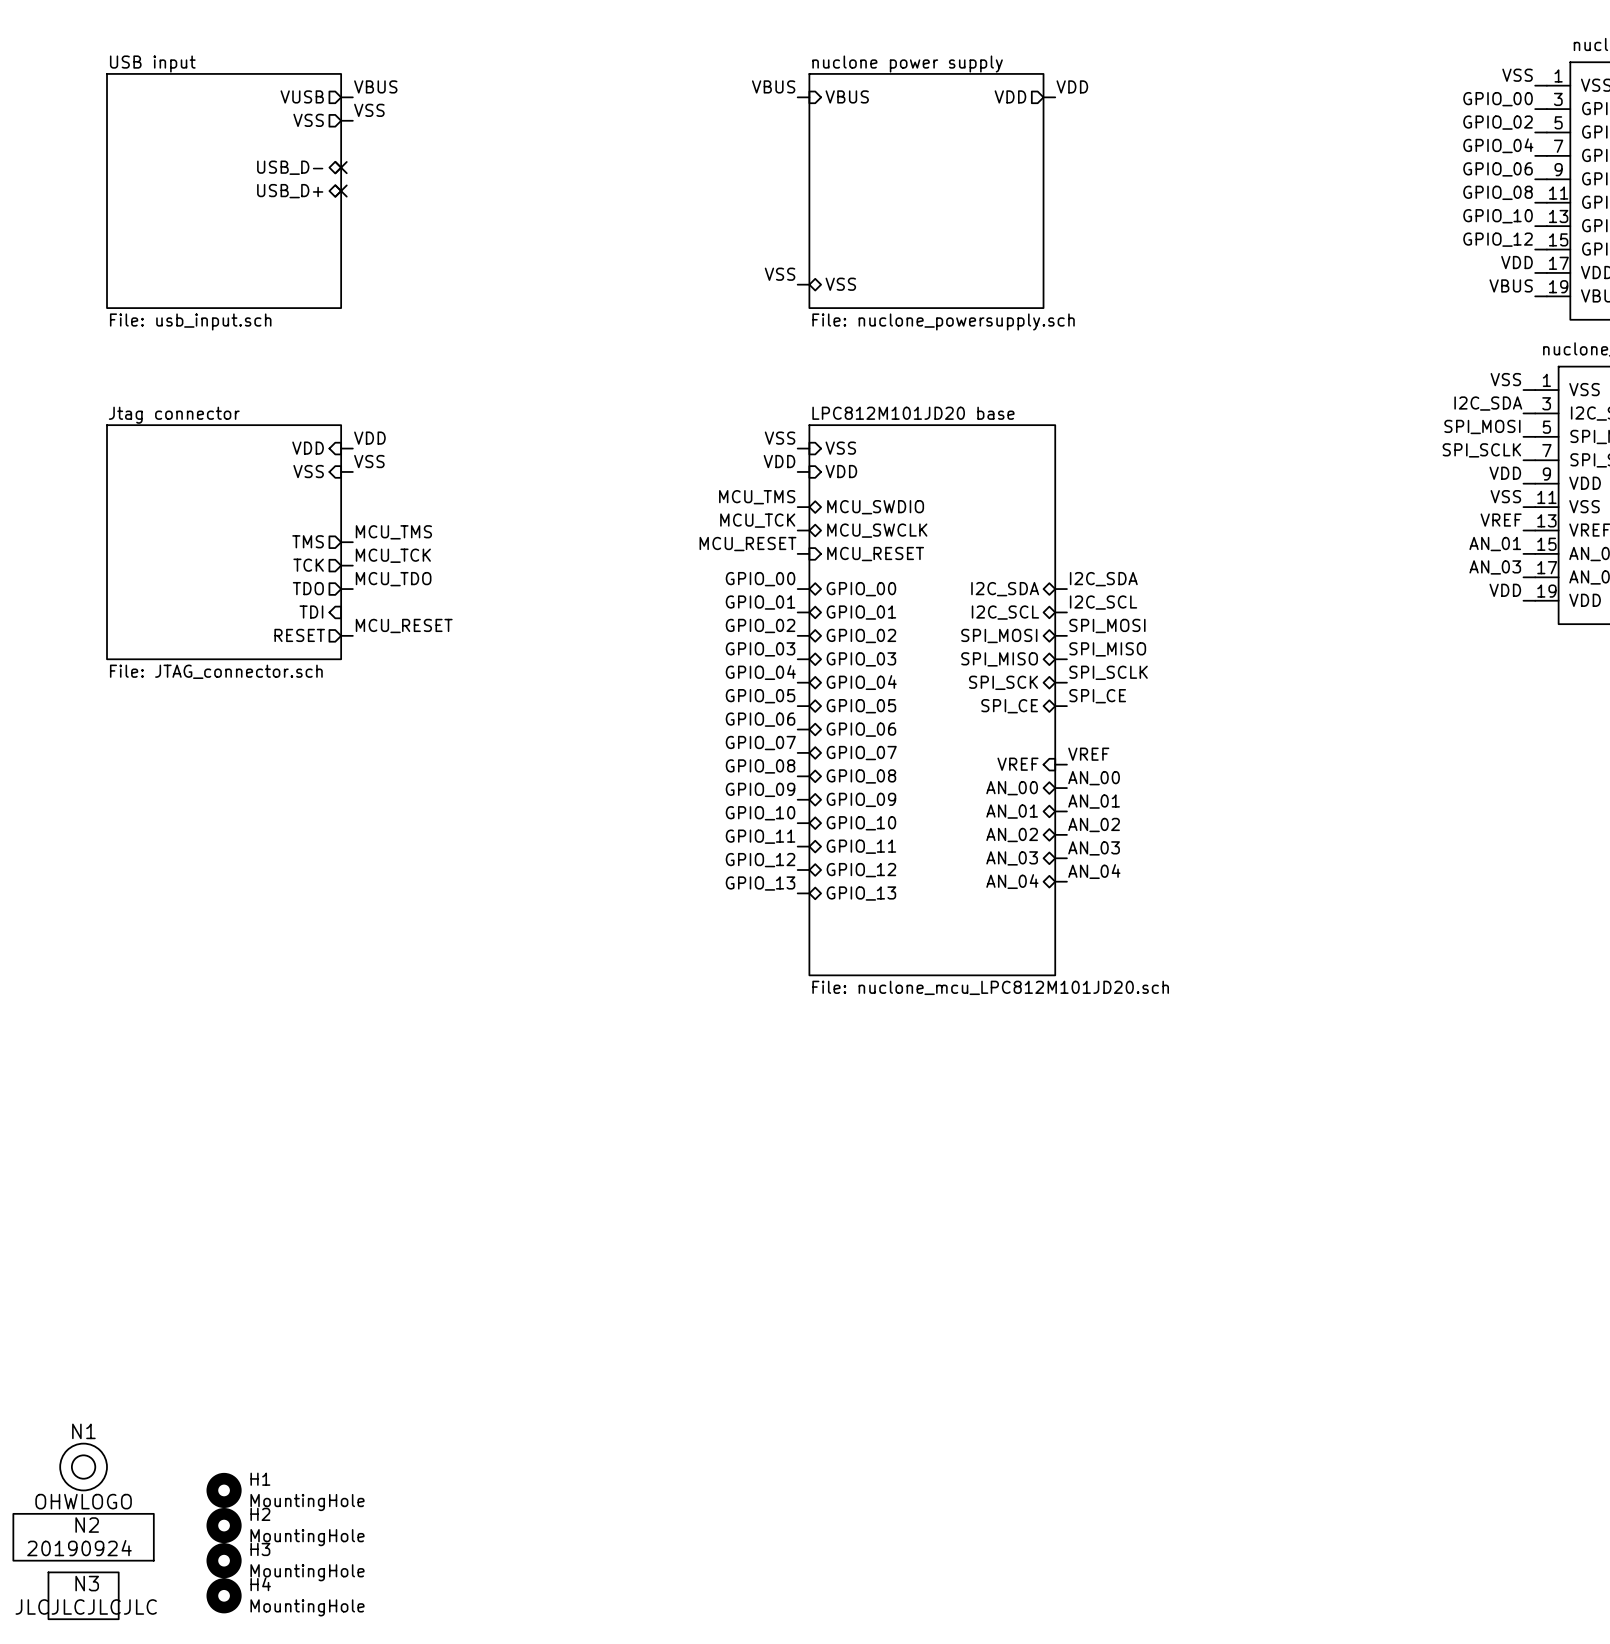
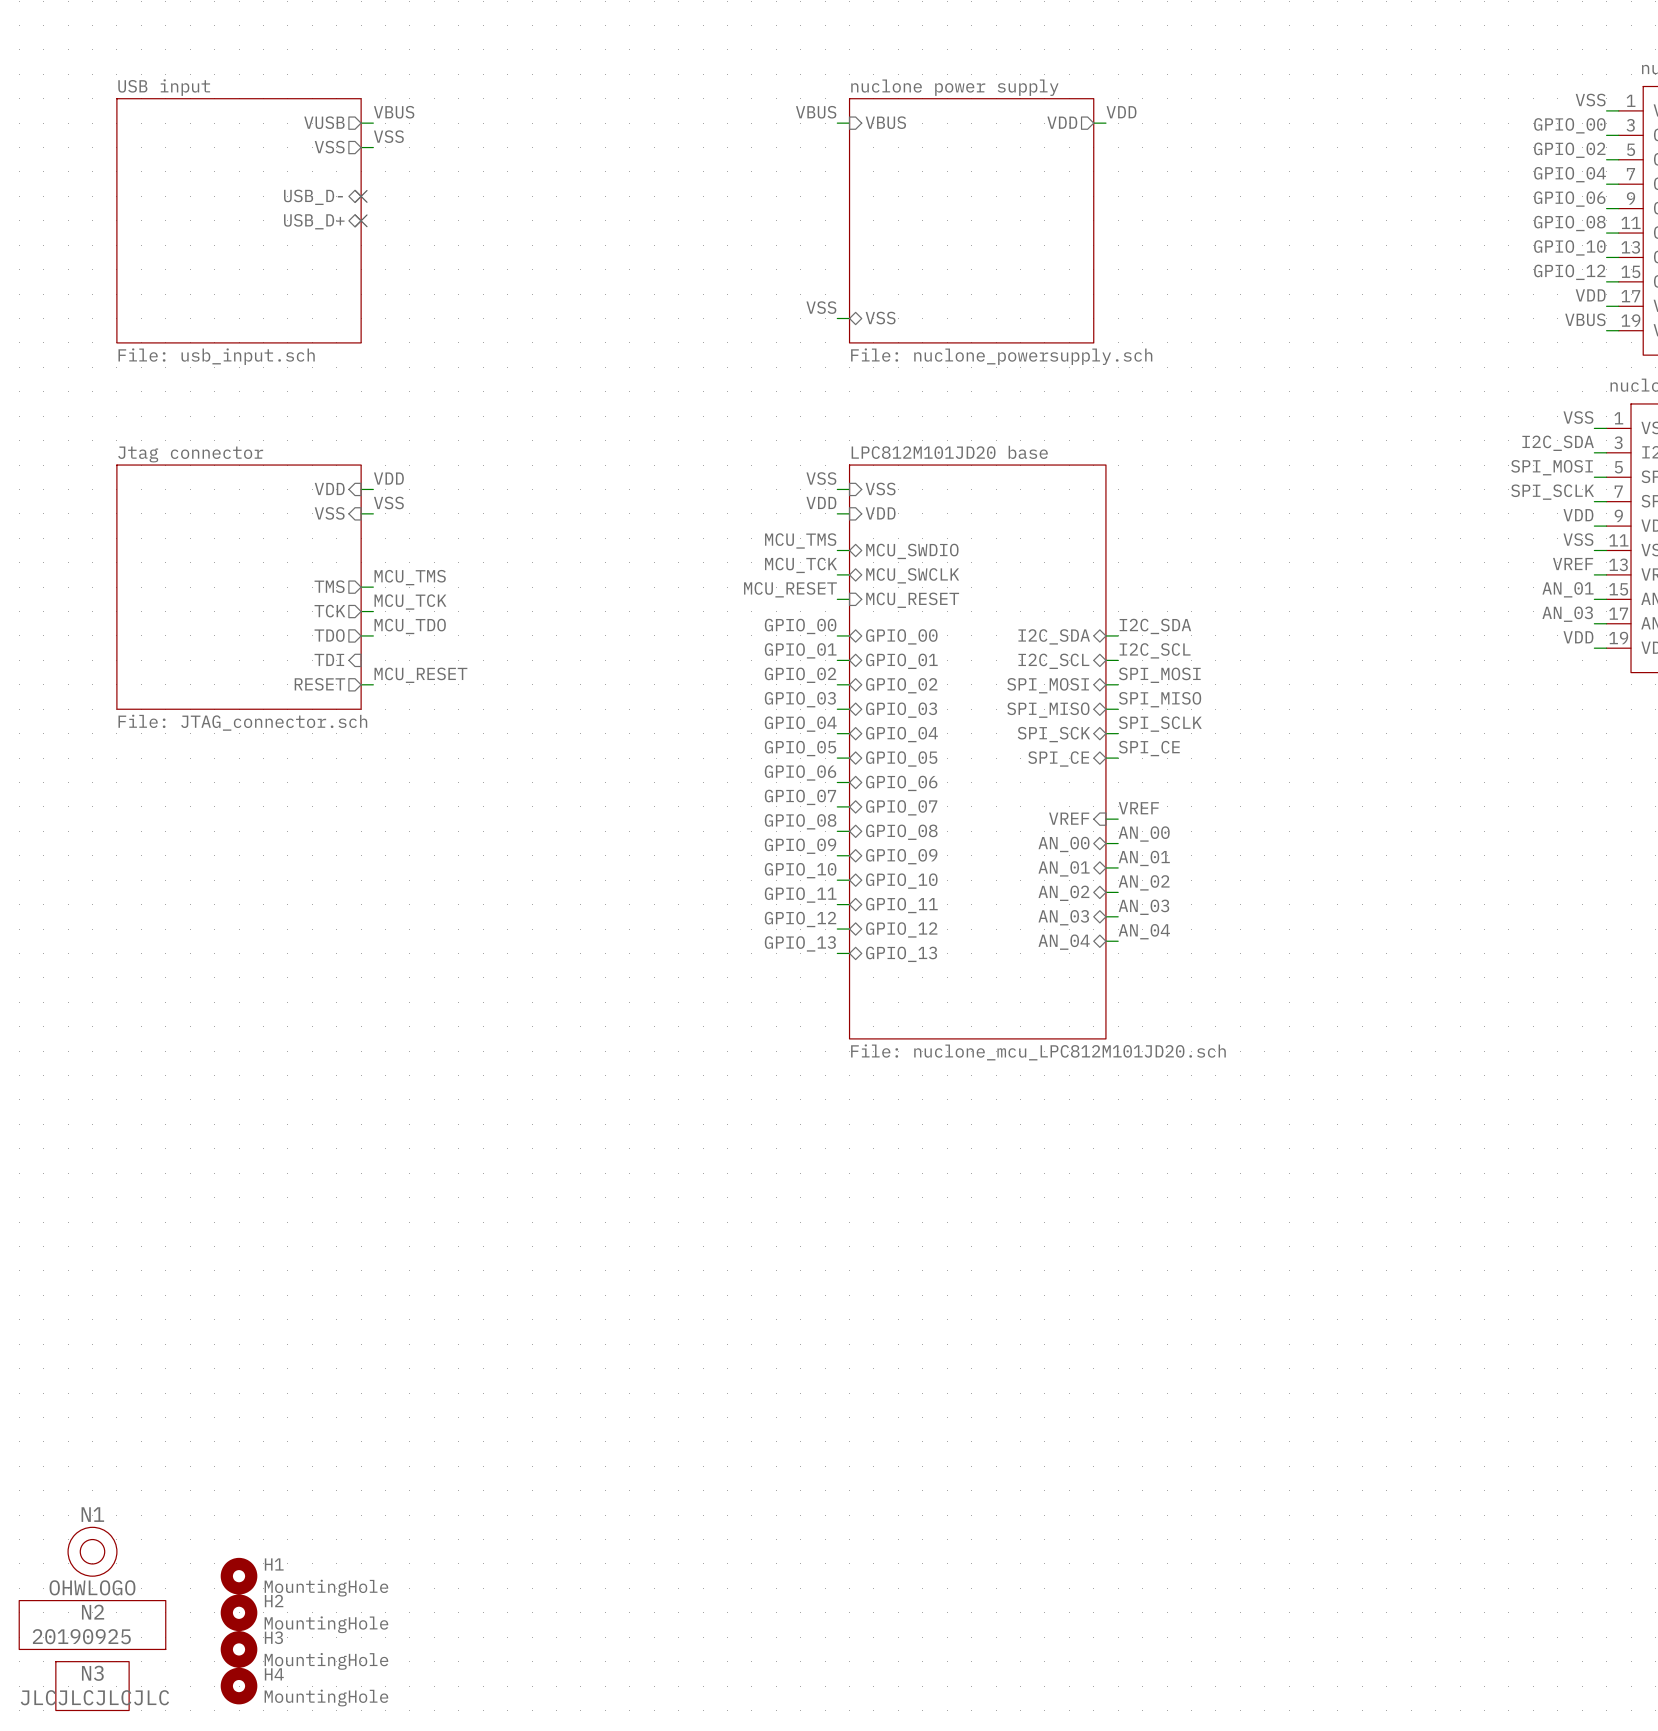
N2 value: 20190924 (79, 1548) -> 20190925 (81, 1636)

